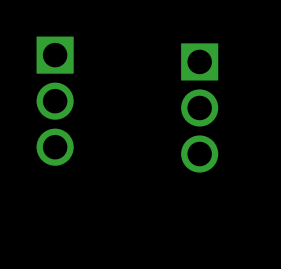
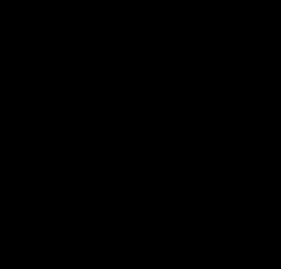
part: (55, 101) -> none
part: (199, 107) -> none

